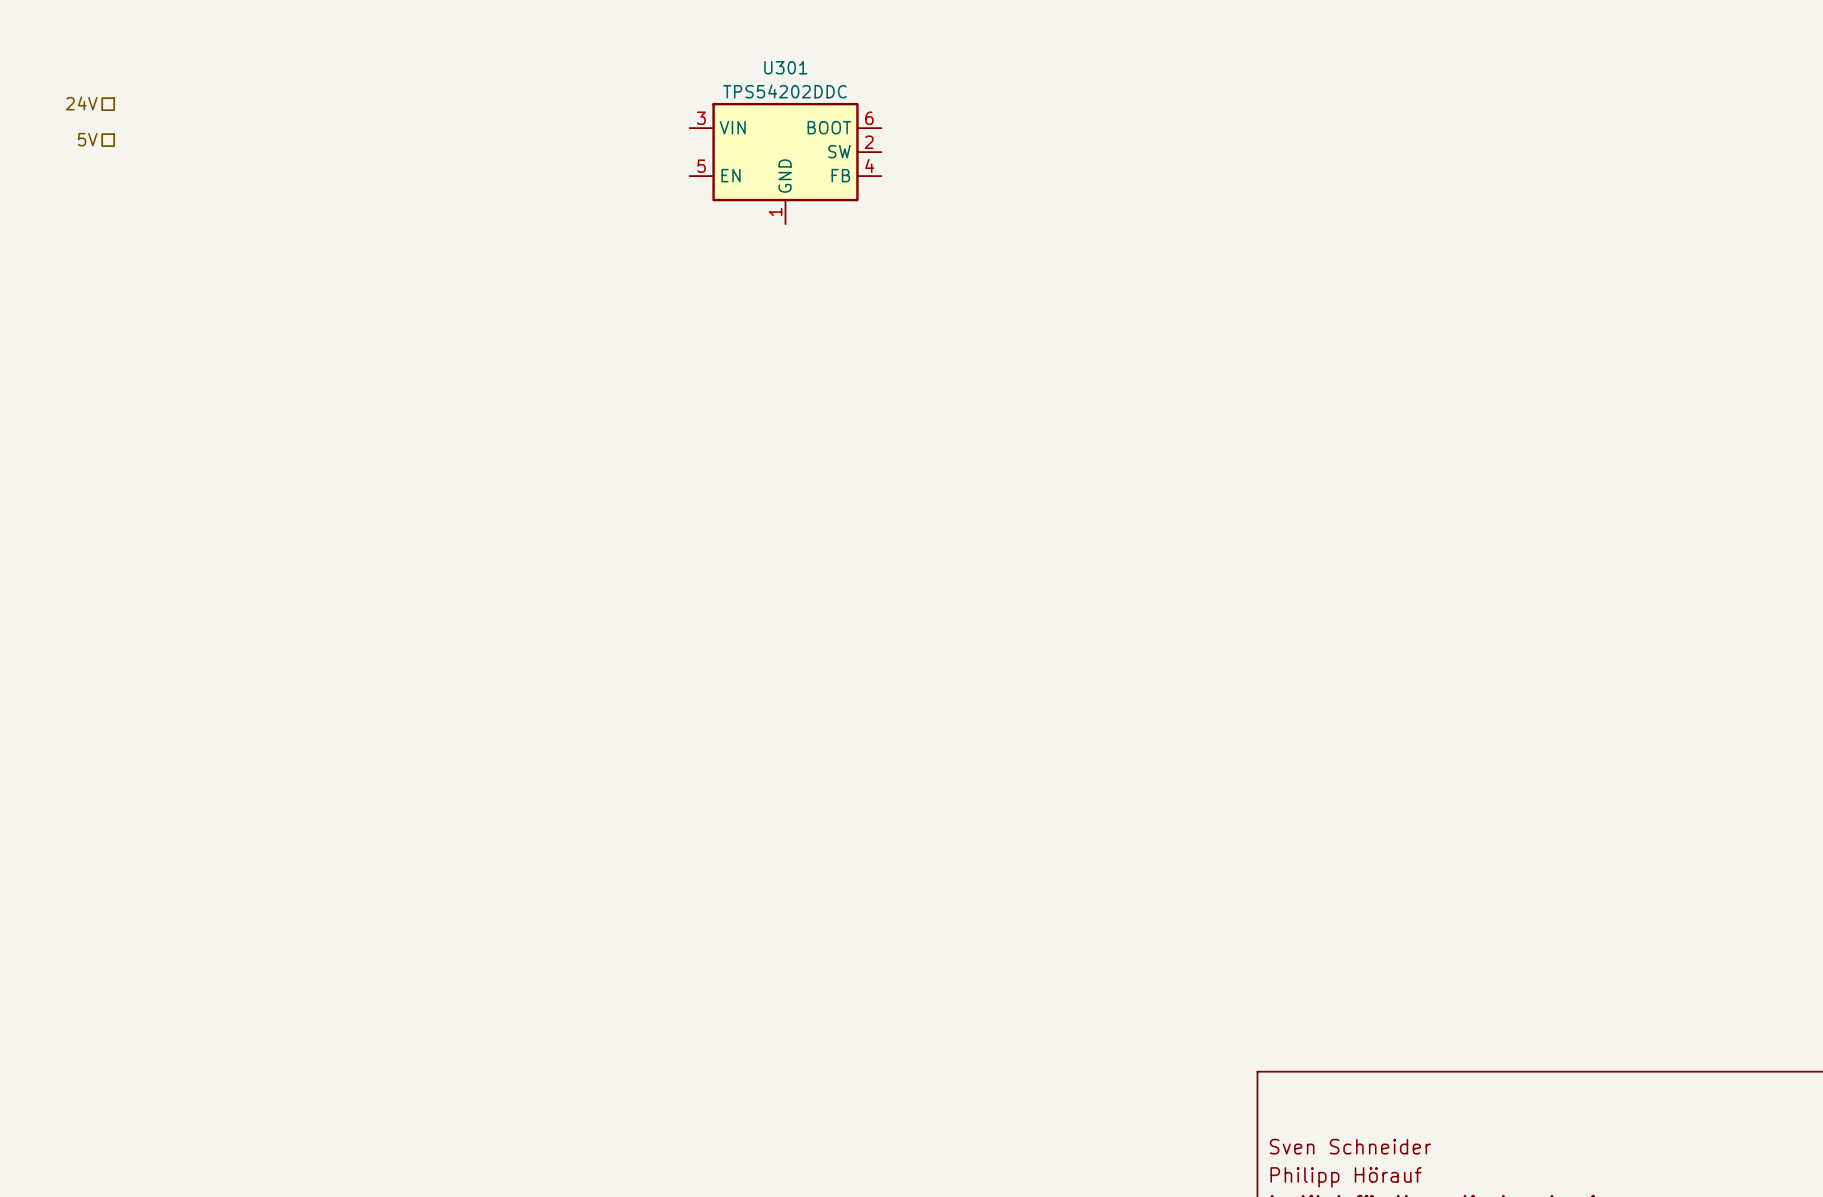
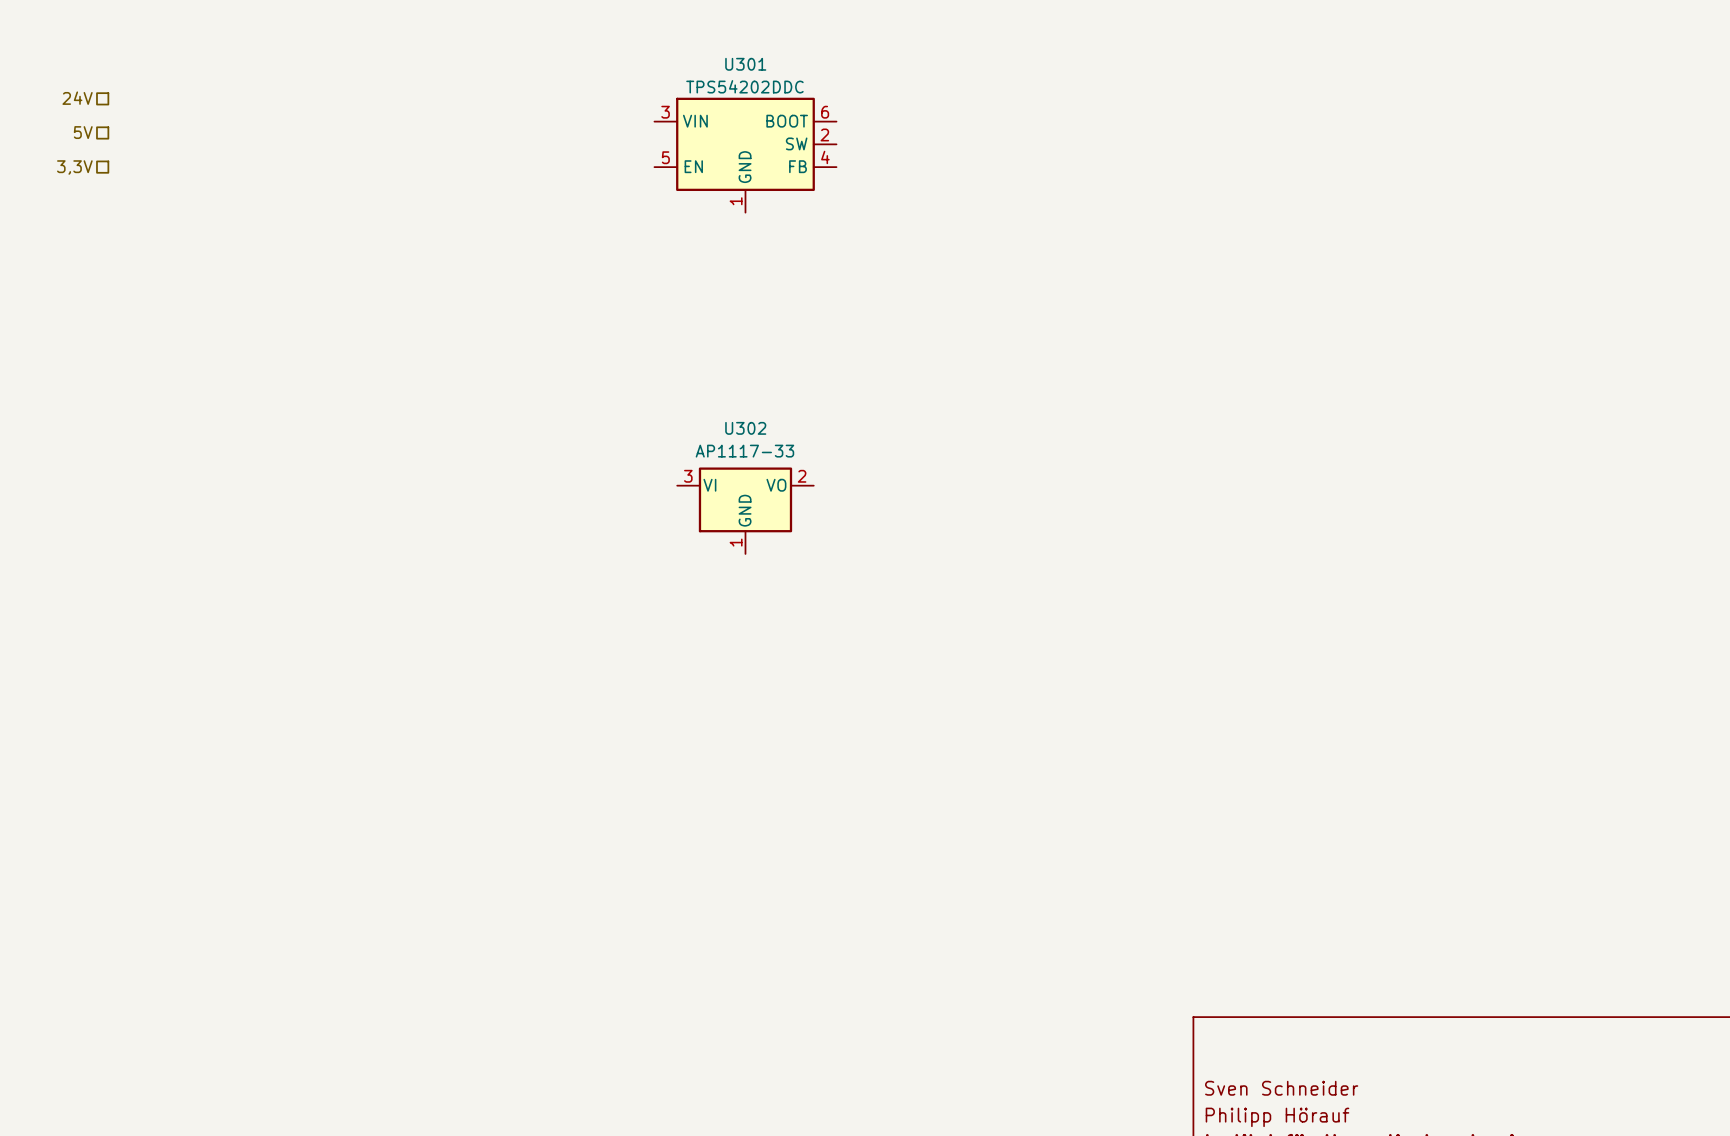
hierarchical label: none -> 3,3V (74, 167)
U302: none -> AP1117-33 (745, 510)

